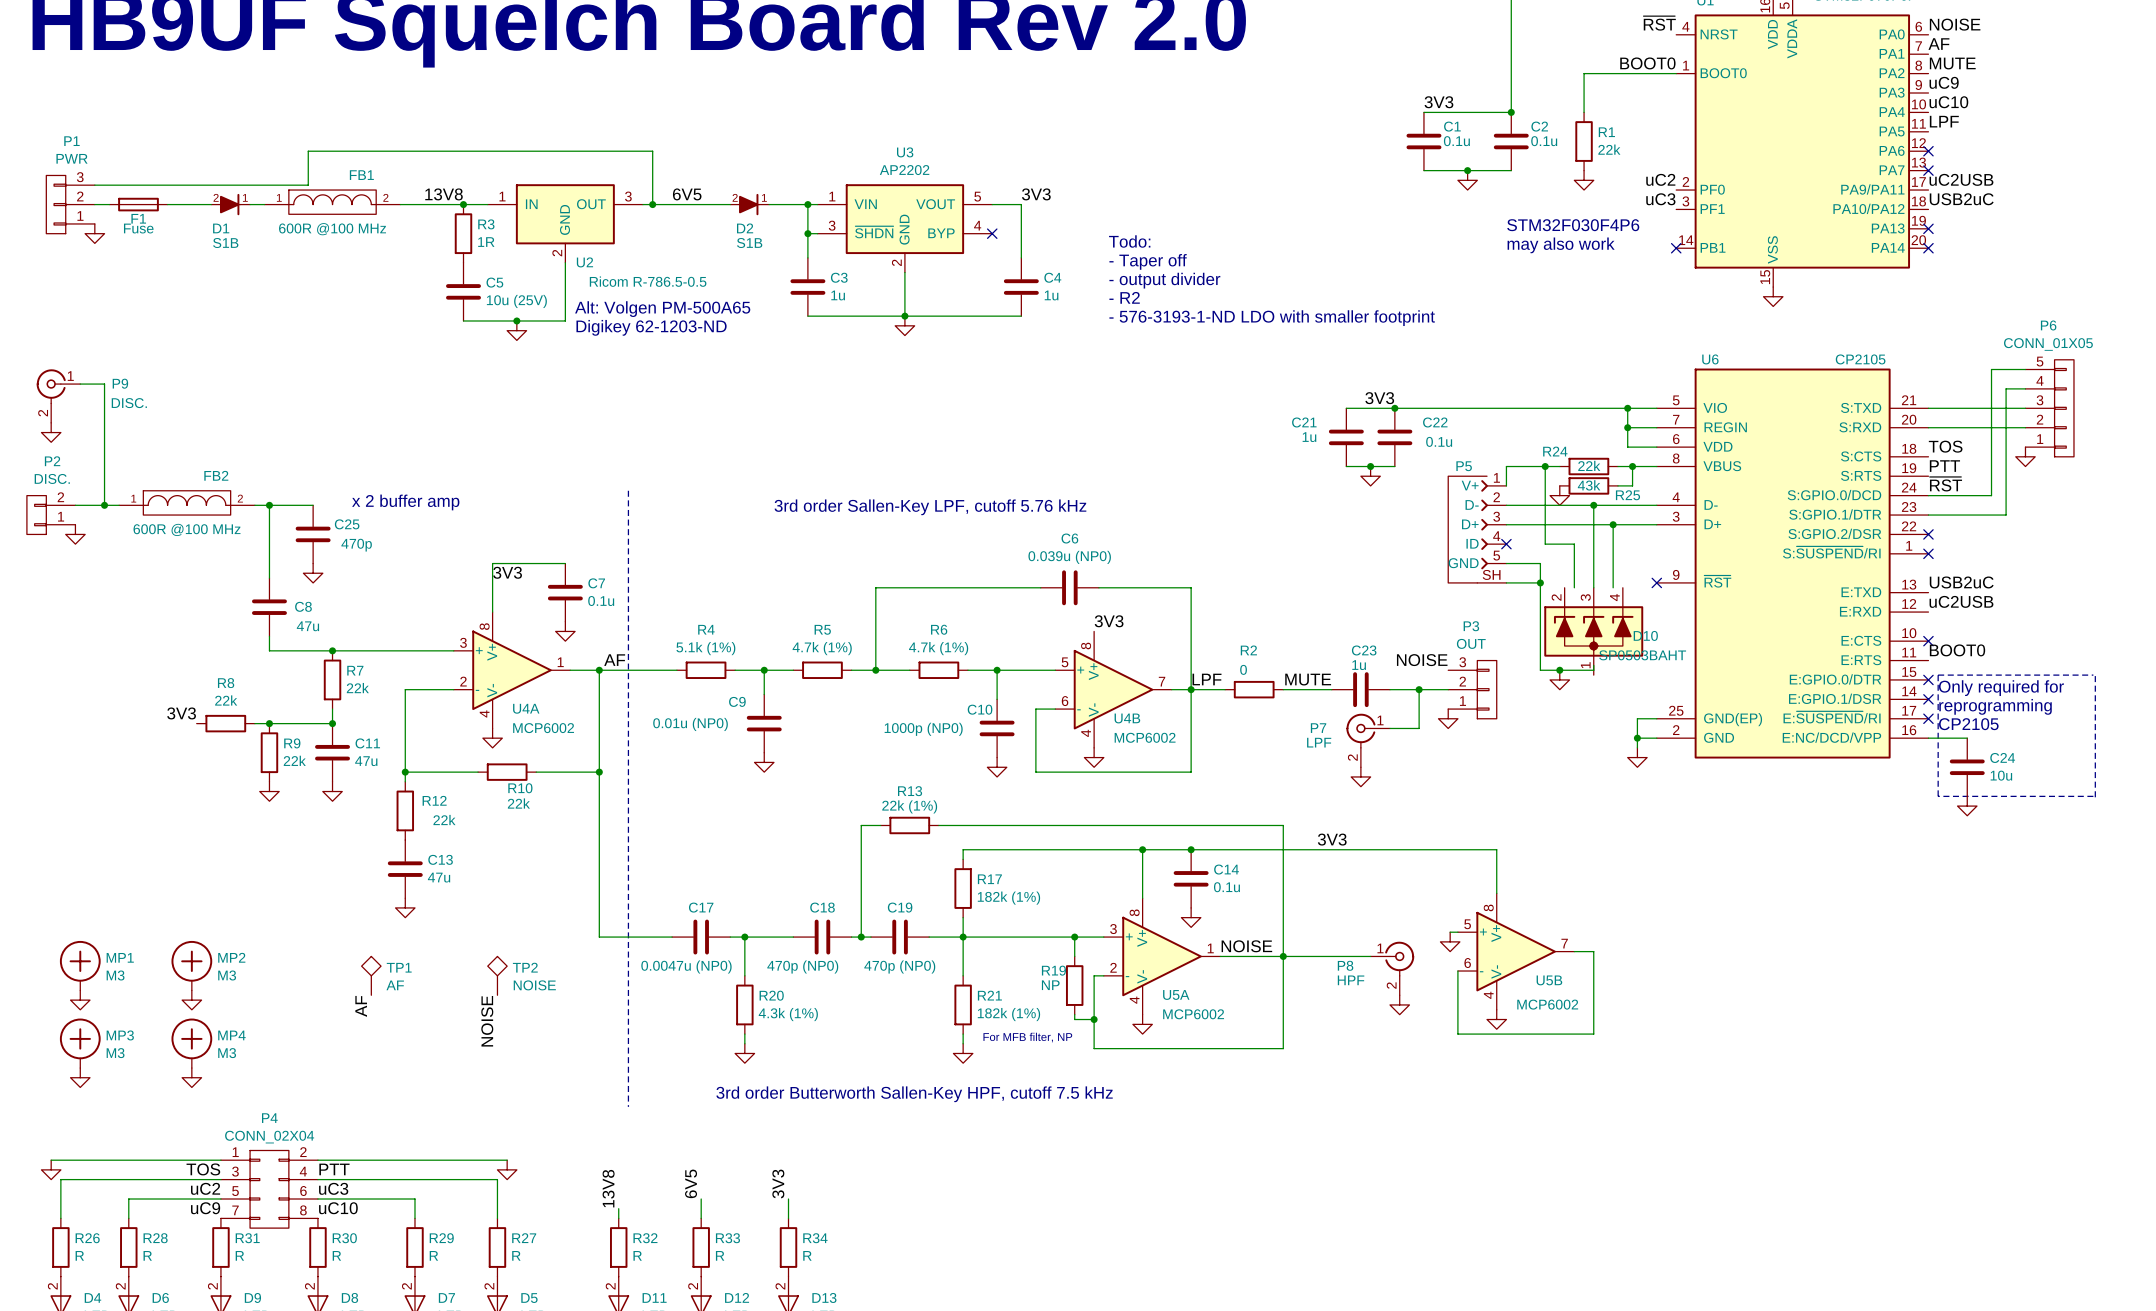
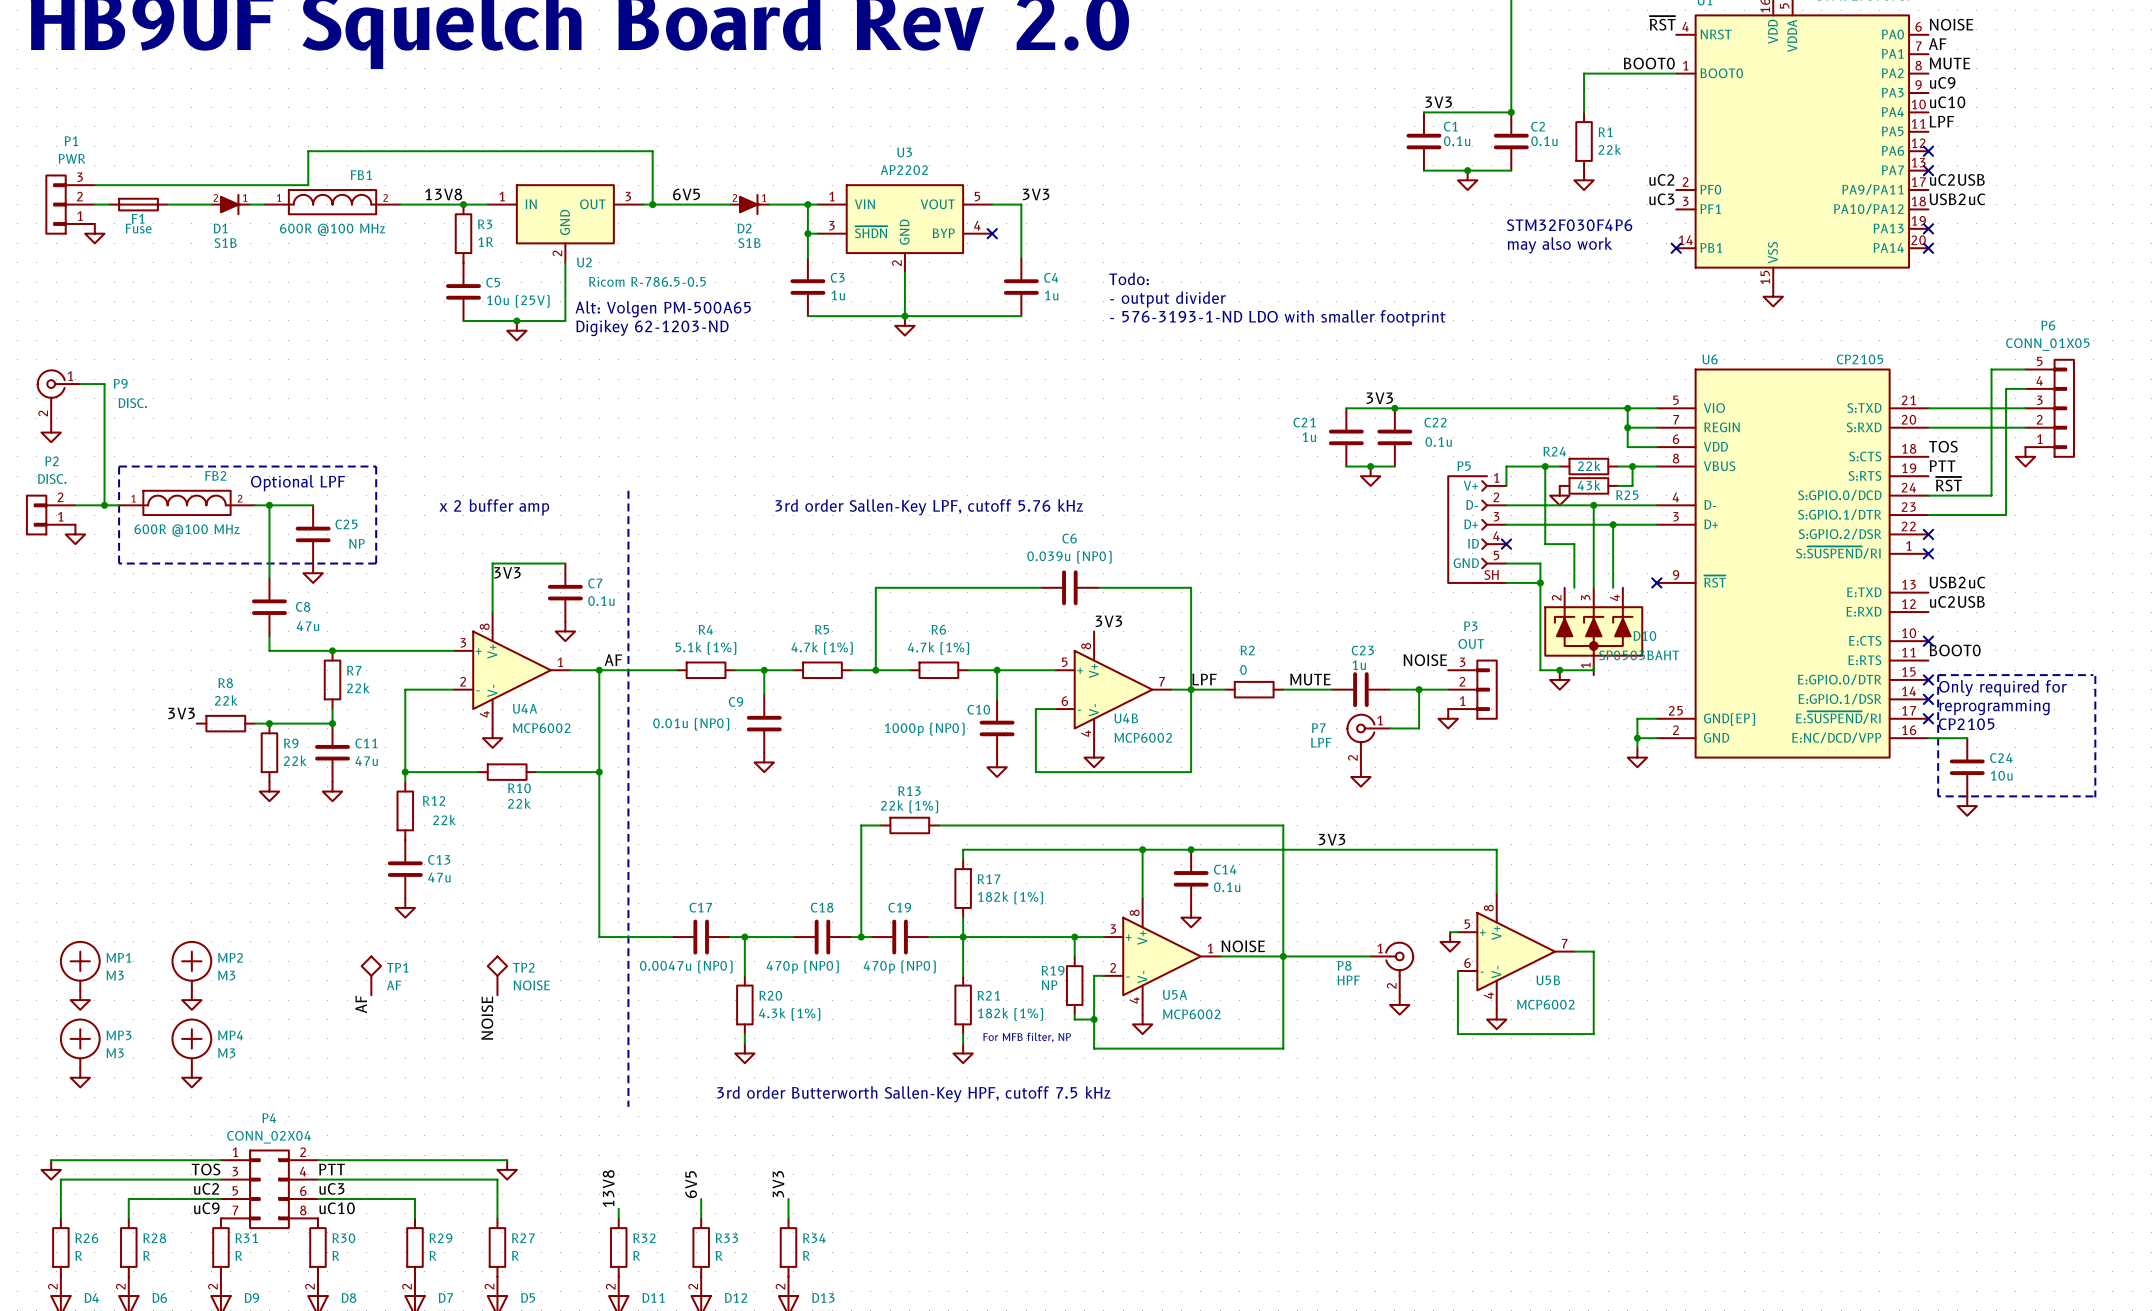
text: Todo: (1129, 241) -> none
text: - Taper off (1148, 261) -> none
text: - output divider (1164, 280) -> Todo: (1129, 278)
text: - R2 (1124, 297) -> - output divider (1168, 299)
line: none -> (119, 466) (376, 466) (376, 563) (119, 563) (119, 466)
text: none -> Optional LPF (298, 483)
text position: x 2 buffer amp (405, 502) -> x 2 buffer amp (494, 507)
C25 value: 470p (356, 545) -> NP (356, 543)

